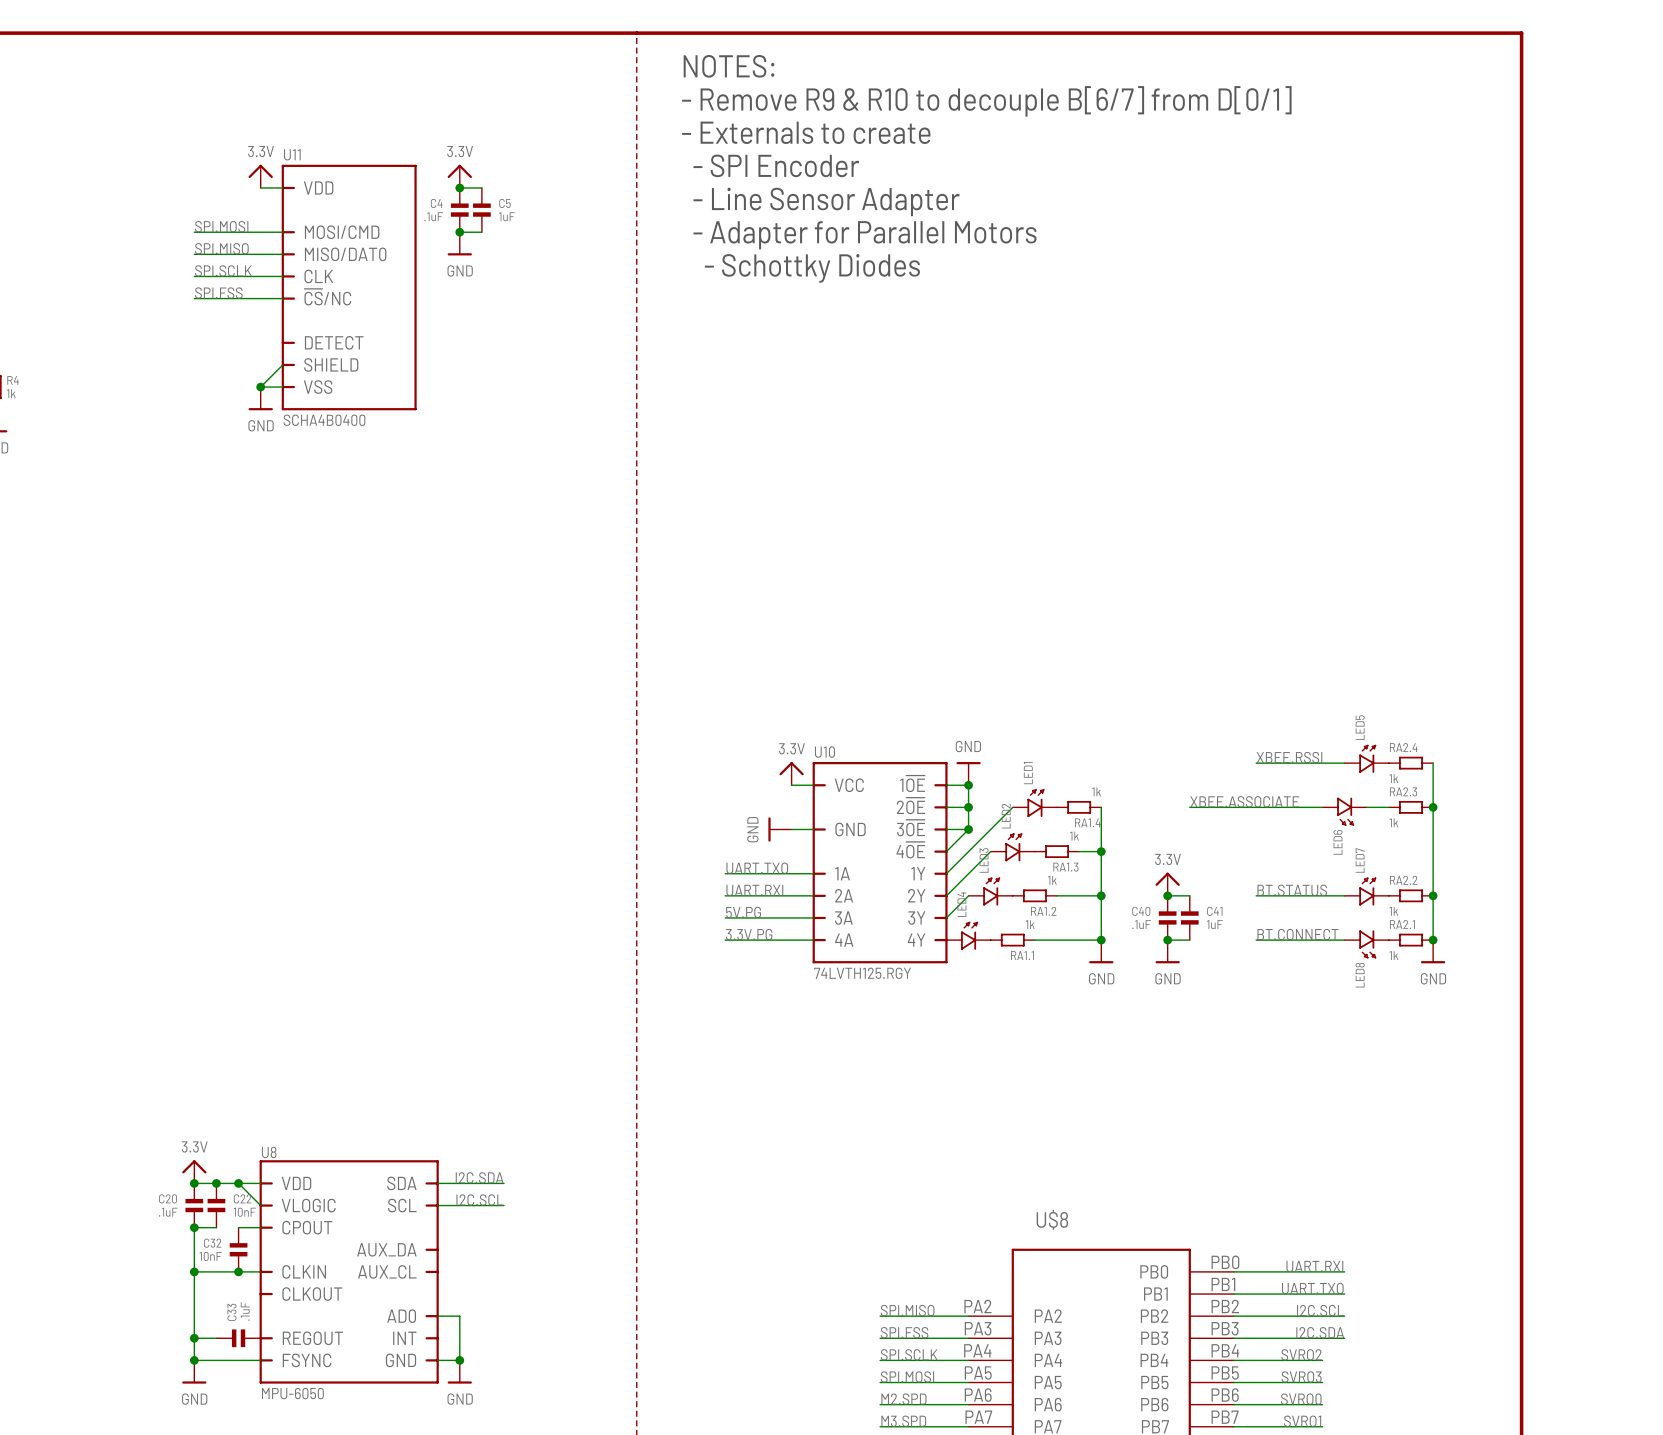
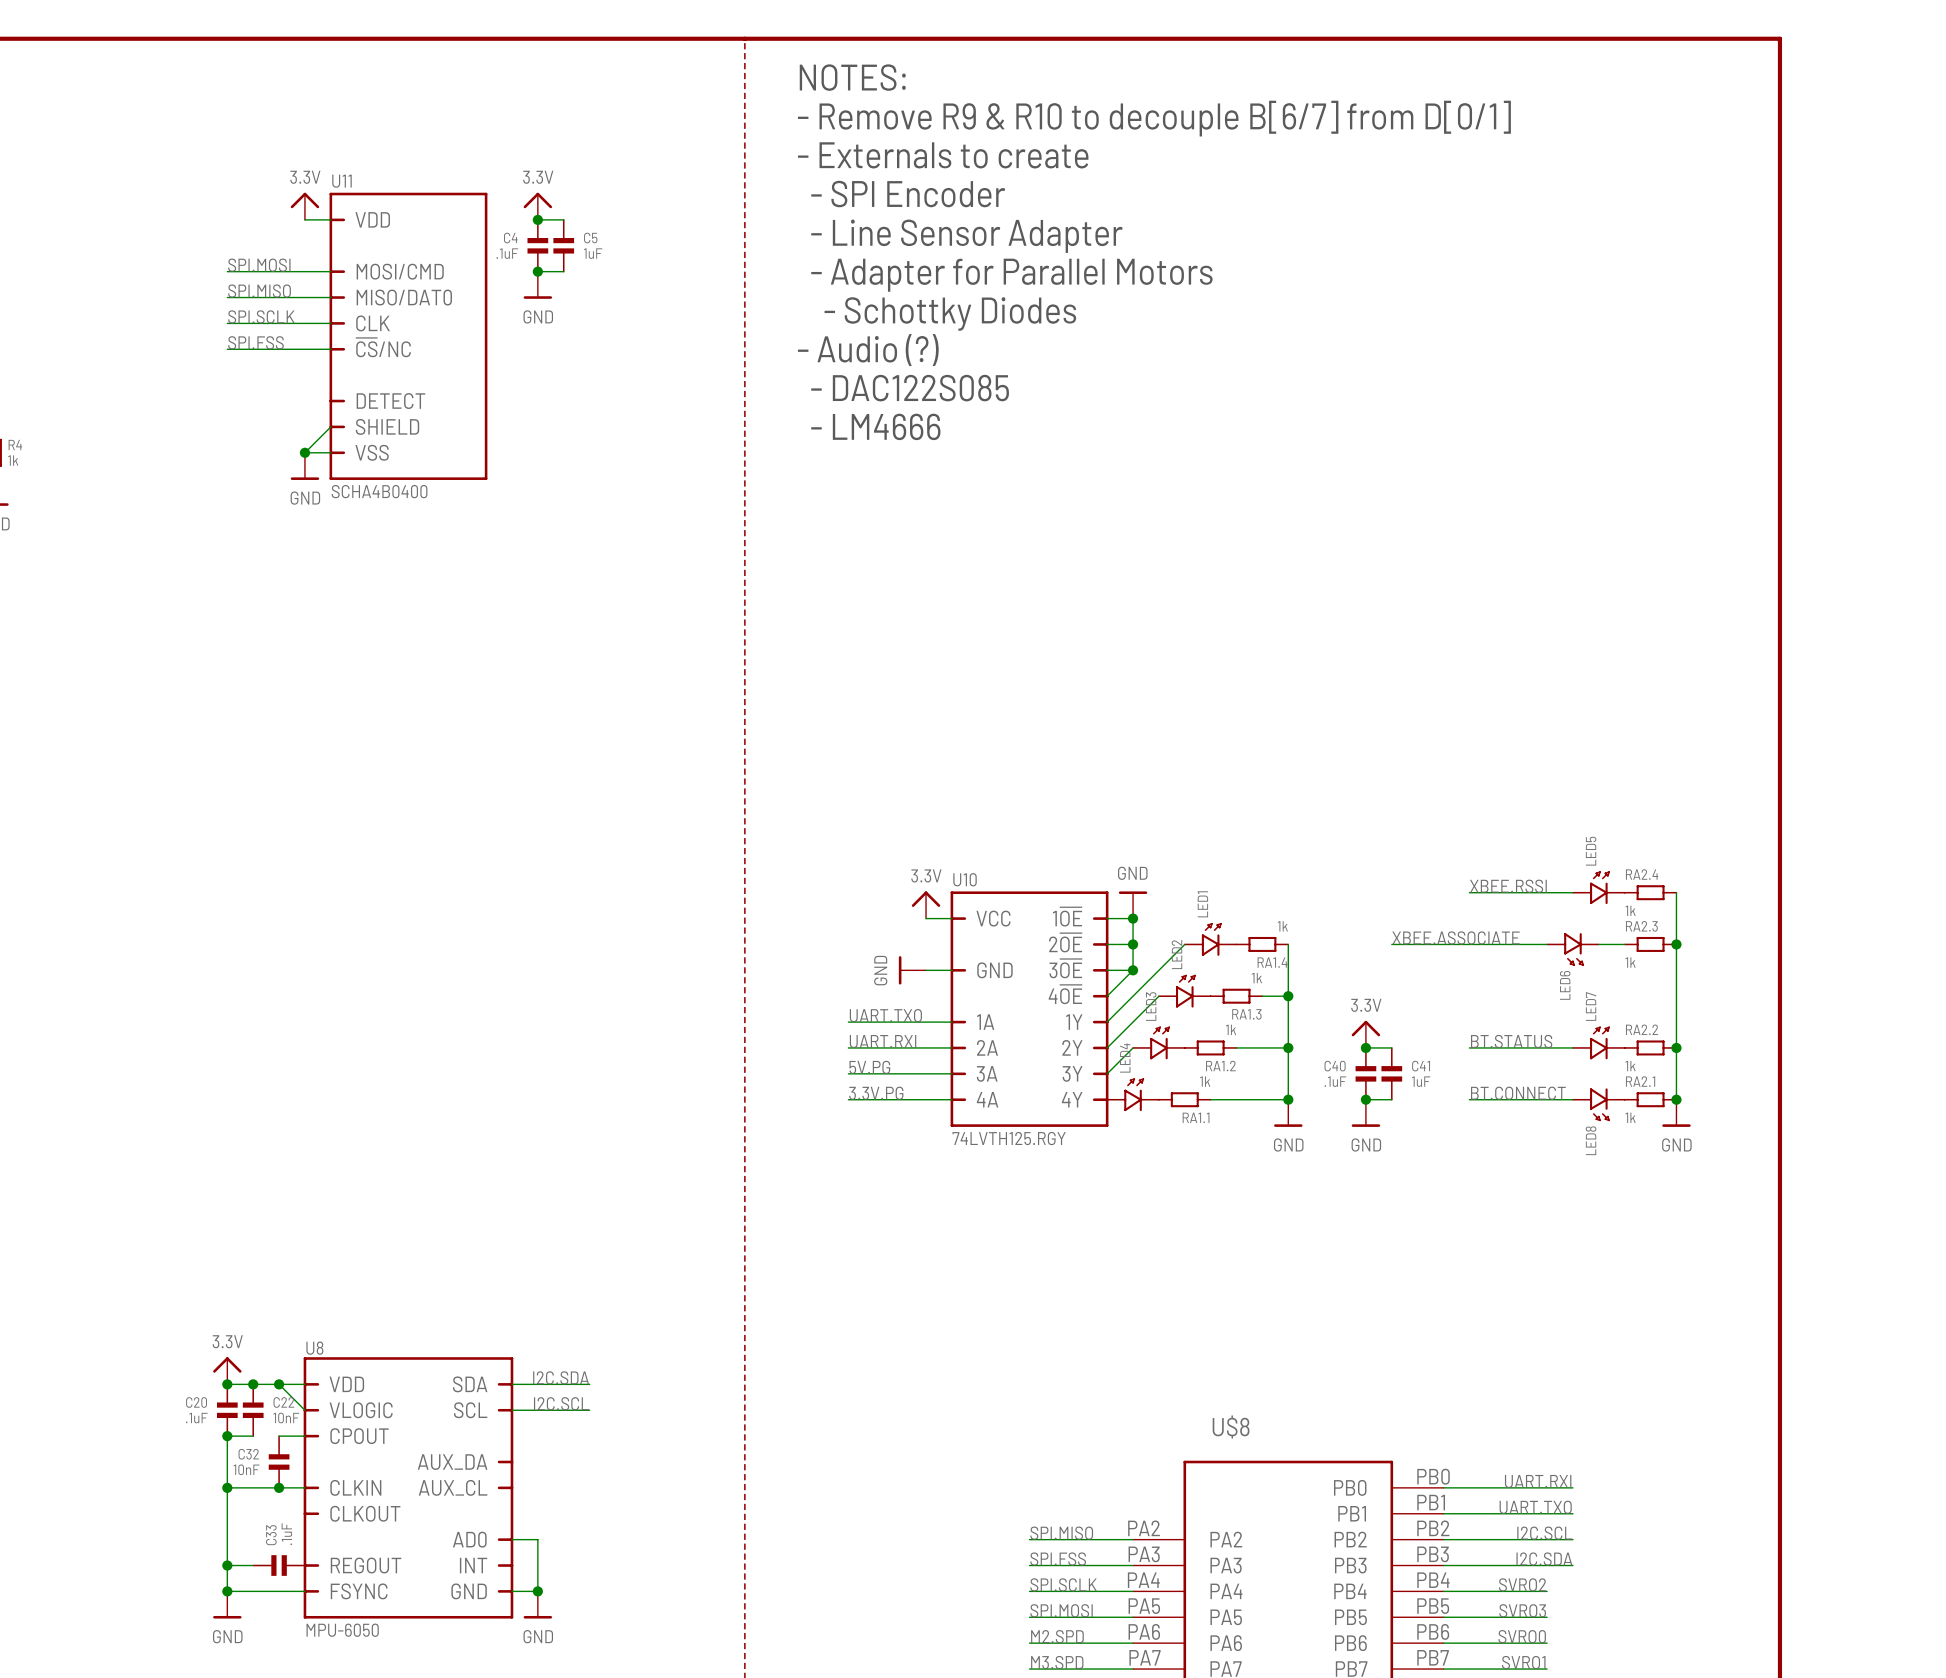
text: none -> - Audio (?) (868, 350)
text: none -> - DAC122S085 (910, 388)
text: none -> - LM4666 (875, 426)

